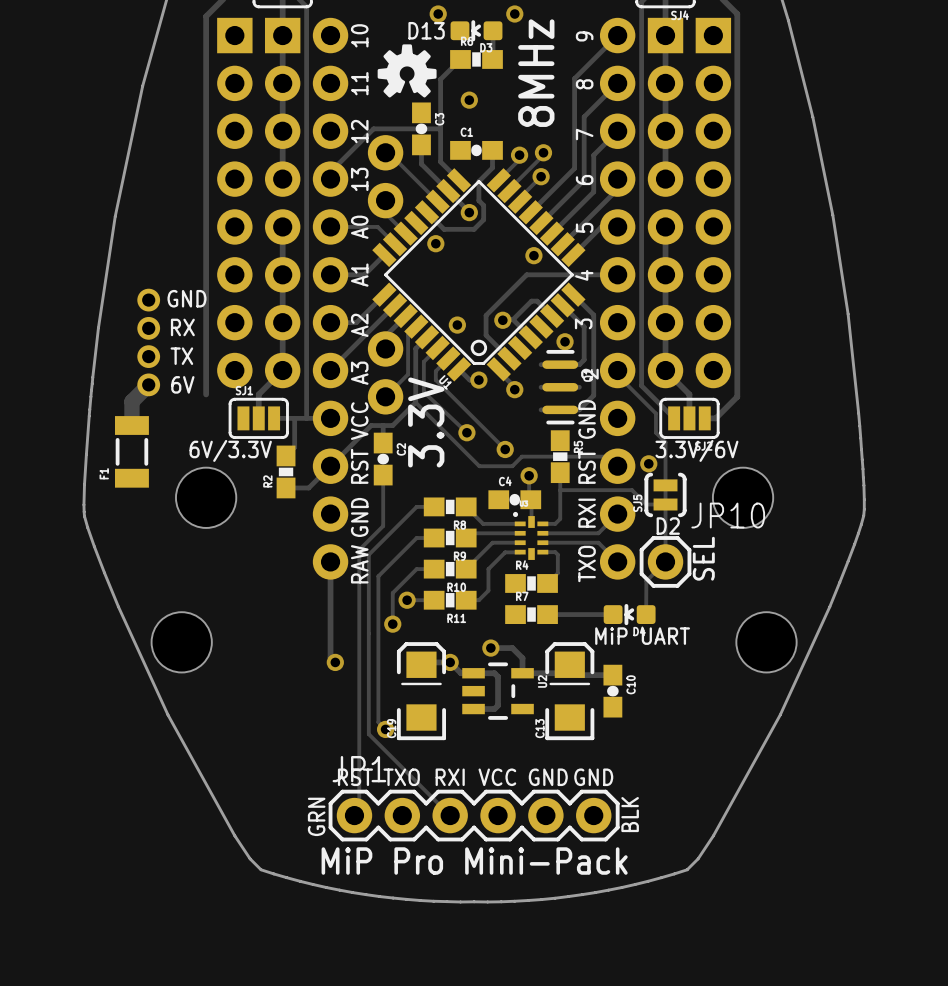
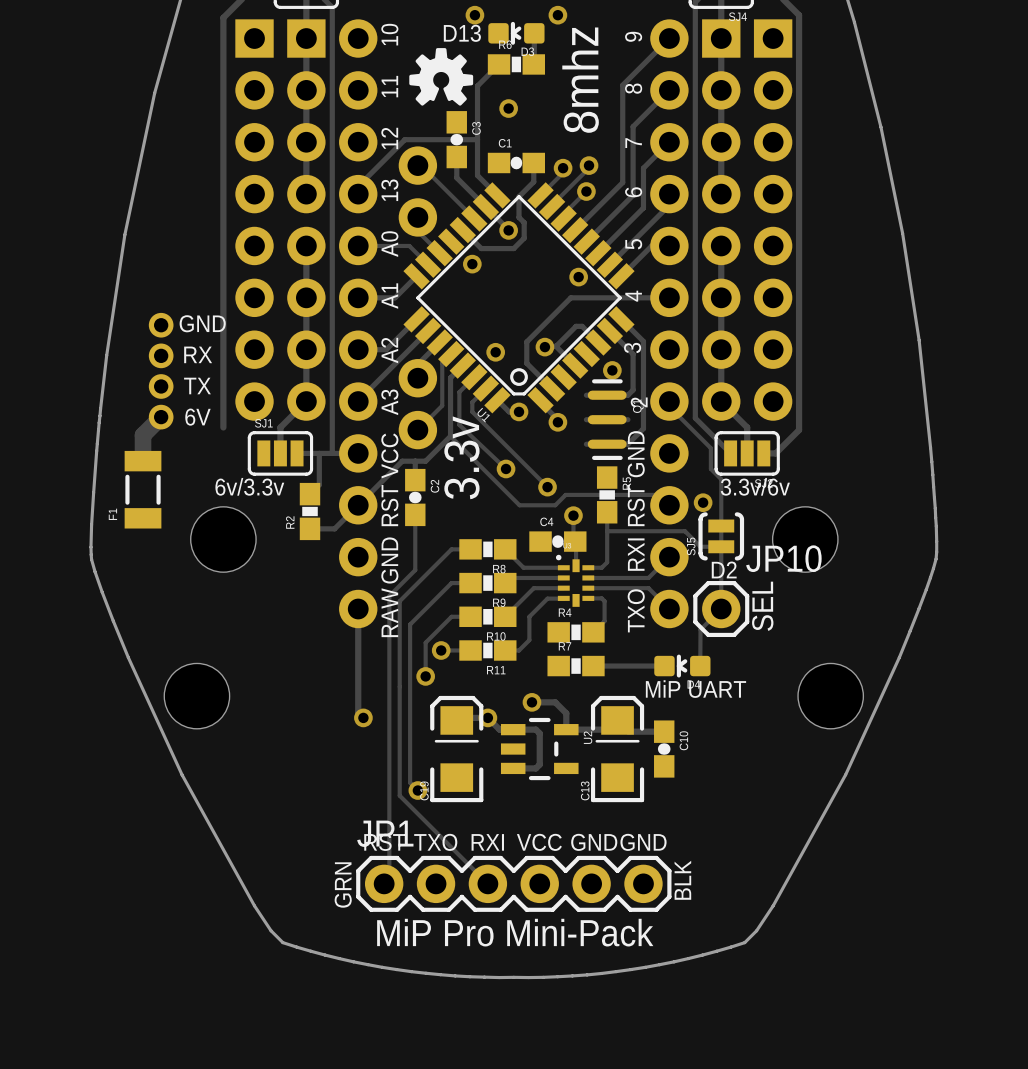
text: 8MHz (536, 73) -> 8mhz (580, 80)
text: 3.3V (426, 422) -> 3.3v (461, 457)
text: 6V/3.3V (230, 450) -> 6v/3.3v (249, 486)
text: 3.3V/6V (696, 450) -> 3.3v/6v (755, 486)

